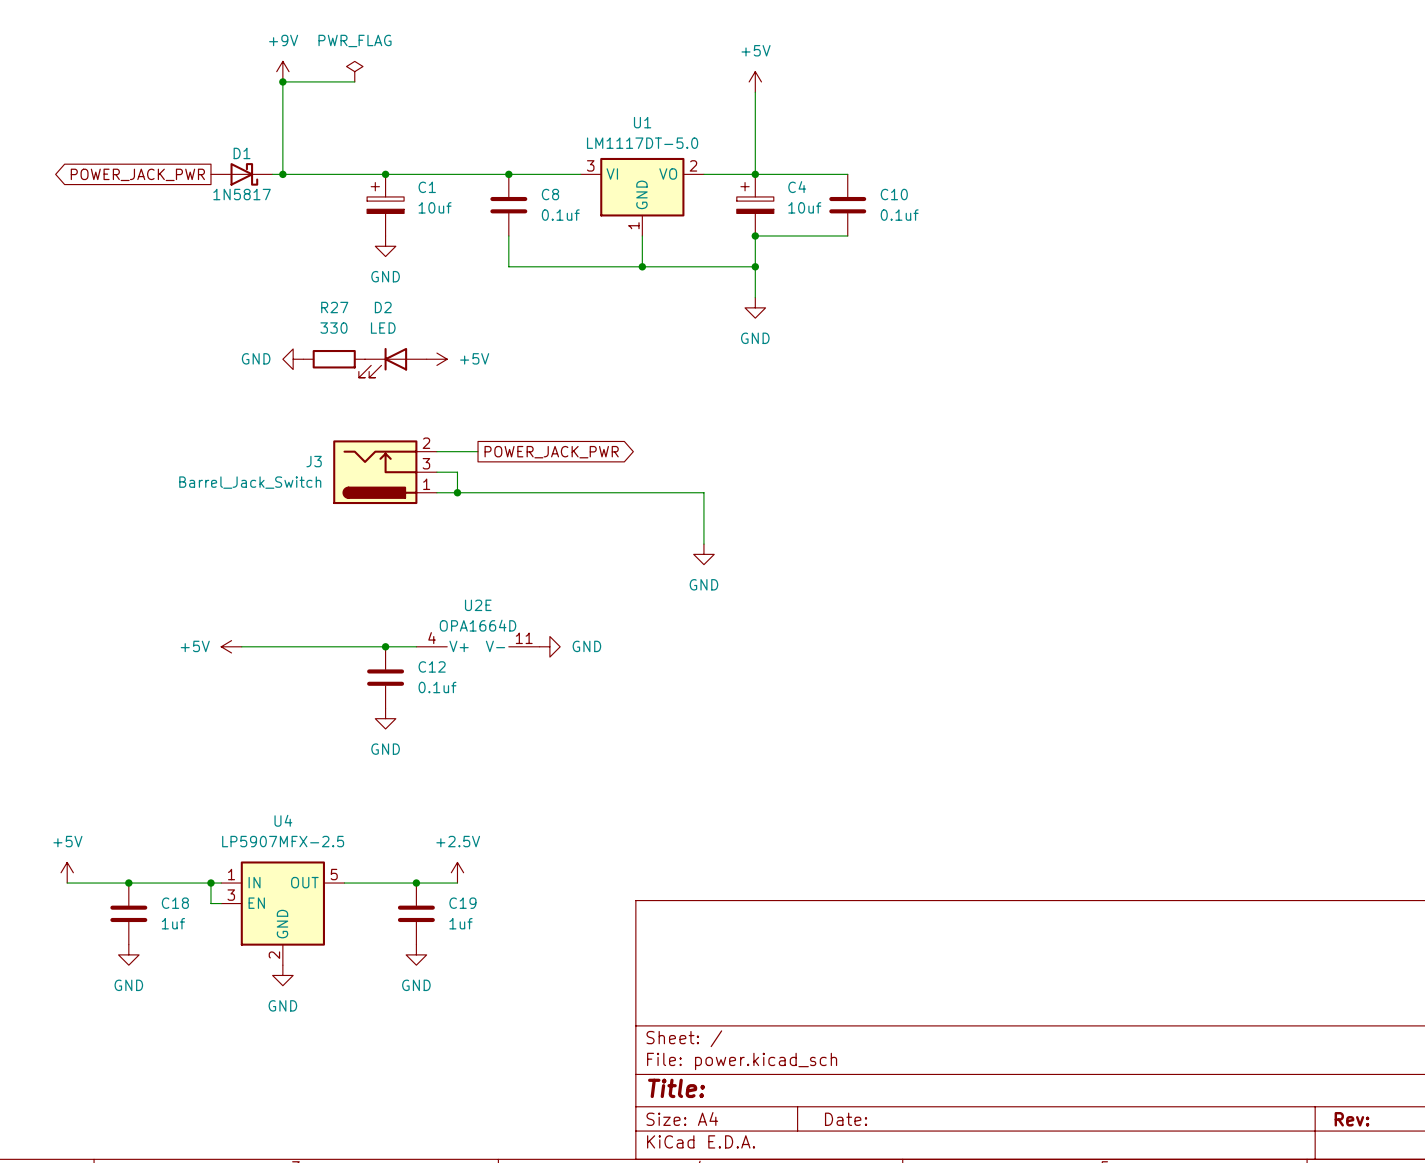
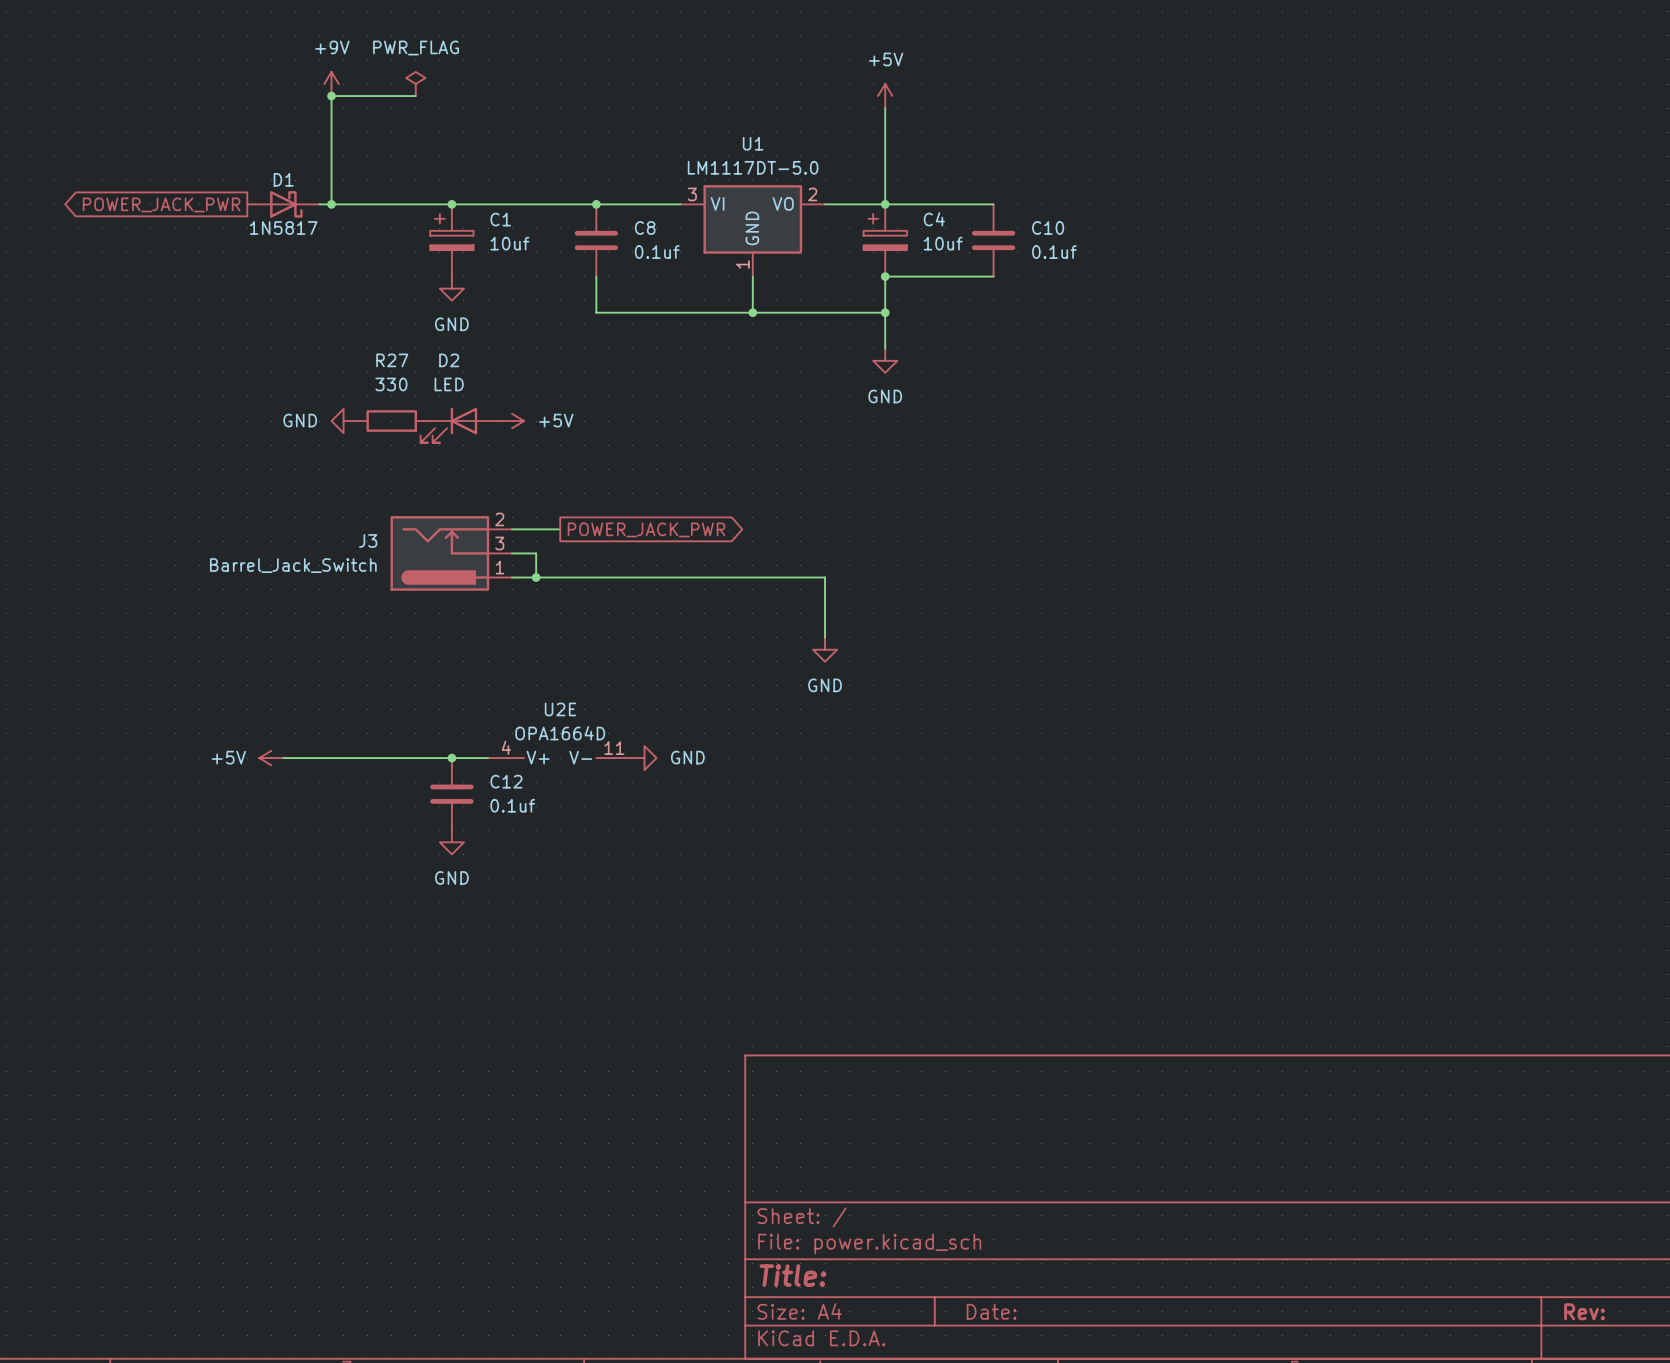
power symbol: +5V (67, 872) -> none
power symbol: +2.5V (457, 872) -> none
wire: (67, 883) (221, 883) -> none
junction: (128, 883) -> none
wire: (210, 883) (210, 903) (221, 903) -> none
junction: (210, 883) -> none
wire: (344, 883) (457, 883) -> none
junction: (416, 883) -> none
C18: 1uf (128, 913) -> none
U4: LP5907MFX-2.5 (282, 913) -> none
C19: 1uf (416, 913) -> none
power symbol: GND (128, 954) -> none
power symbol: GND (416, 954) -> none
power symbol: GND (282, 975) -> none

